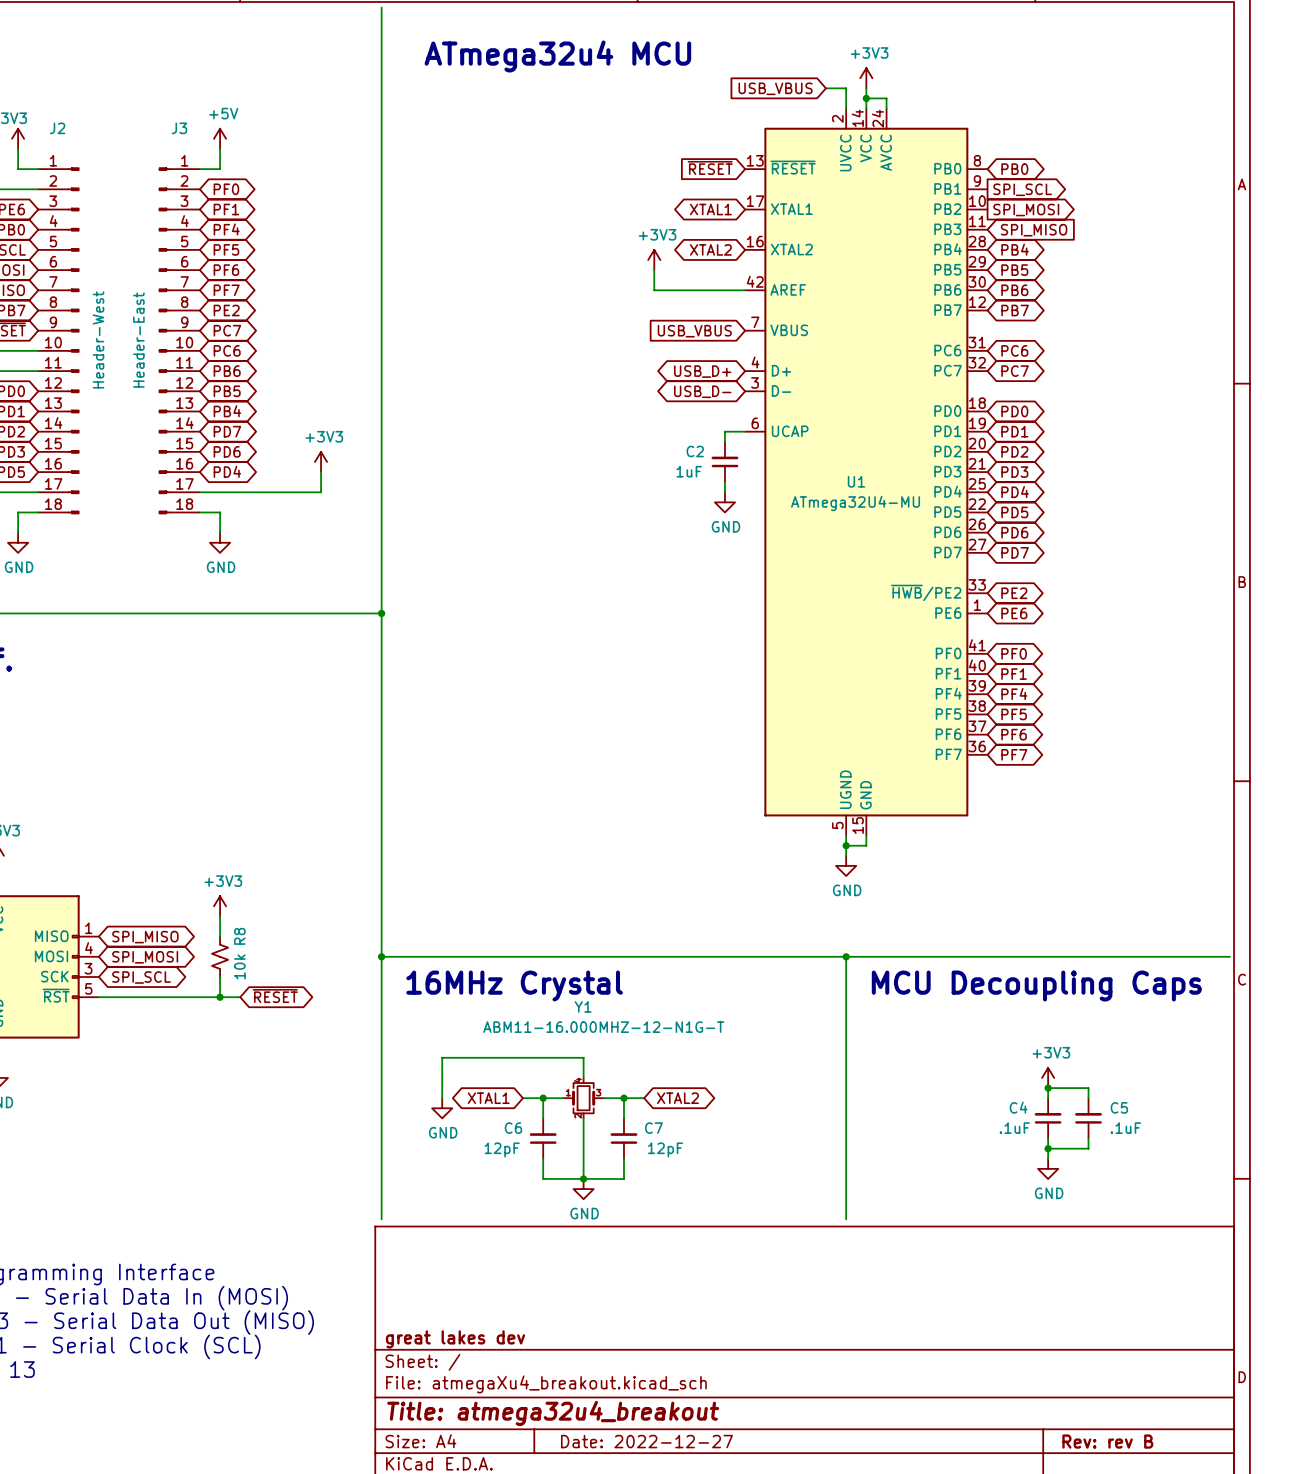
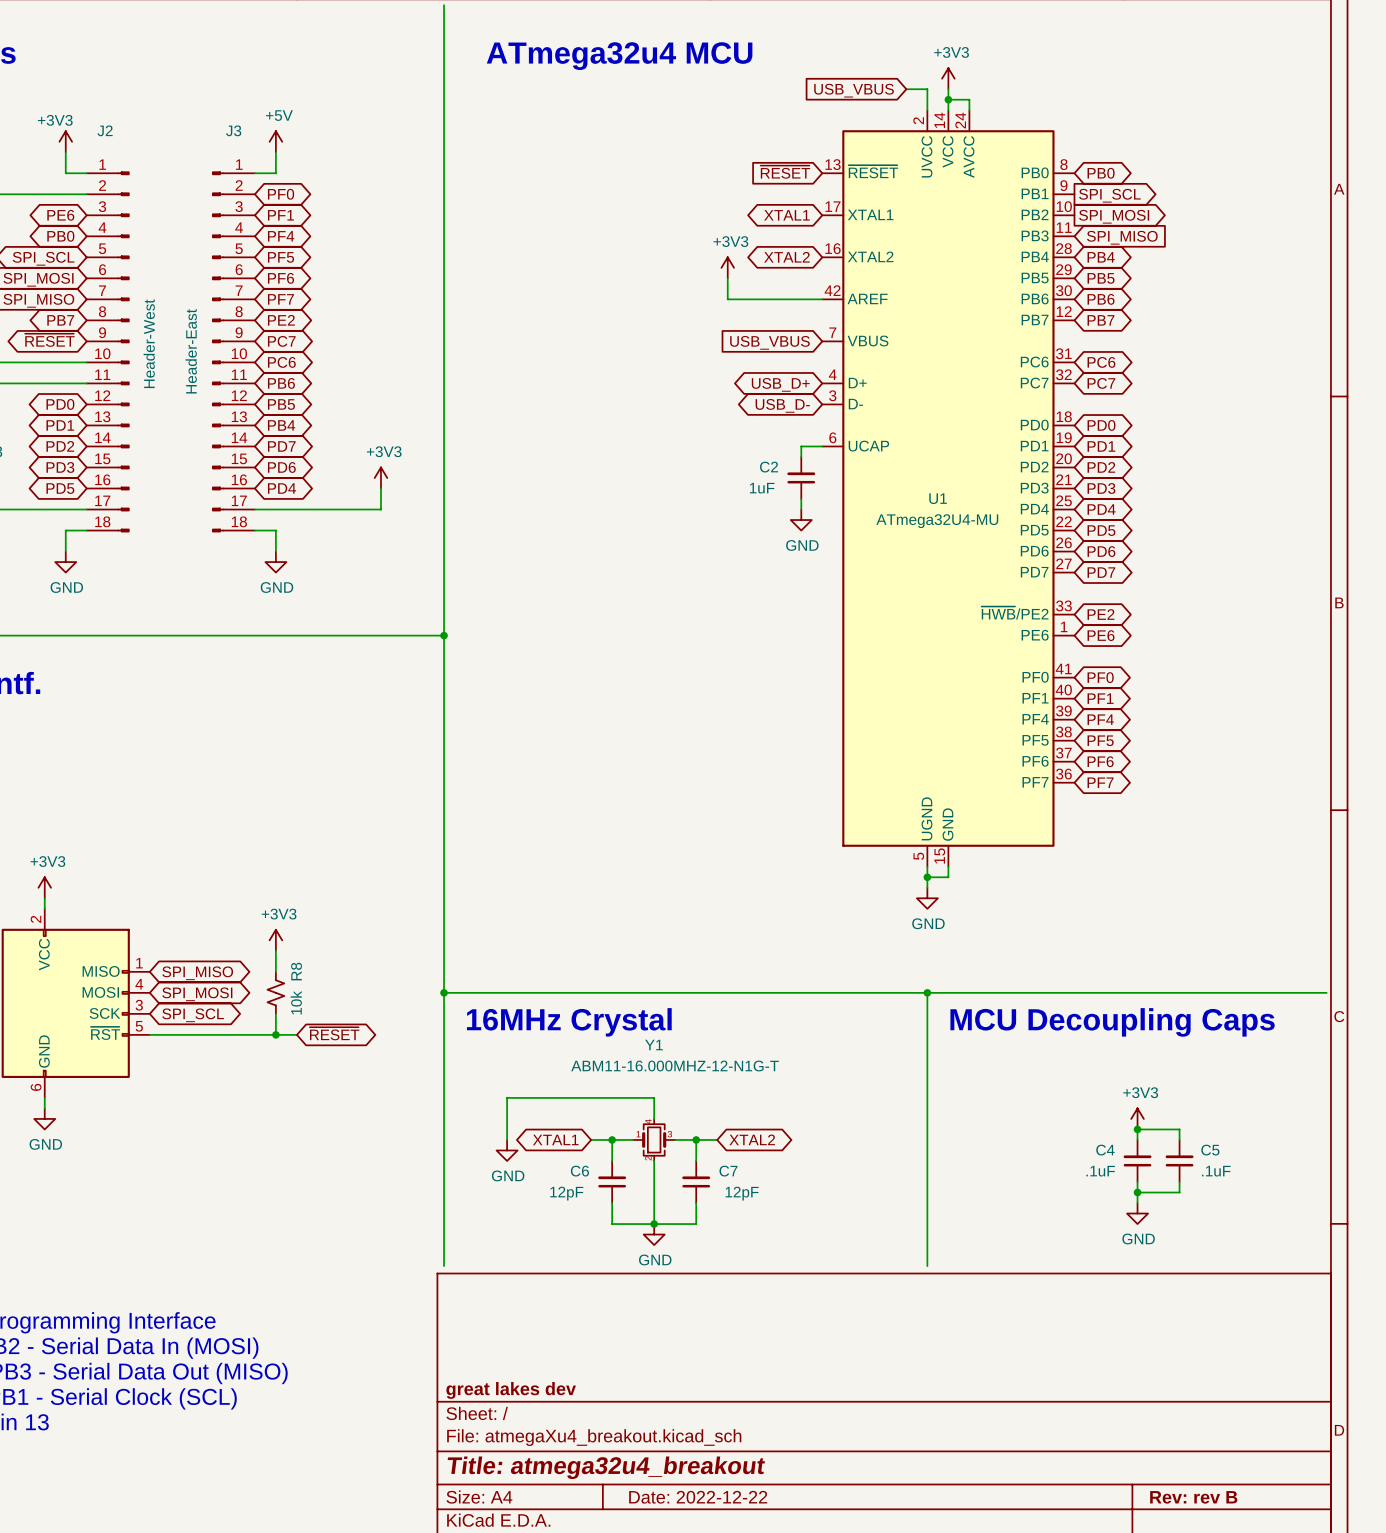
title block: Date: 2022-12-27 (646, 1441) -> Date: 2022-12-22 (698, 1497)

